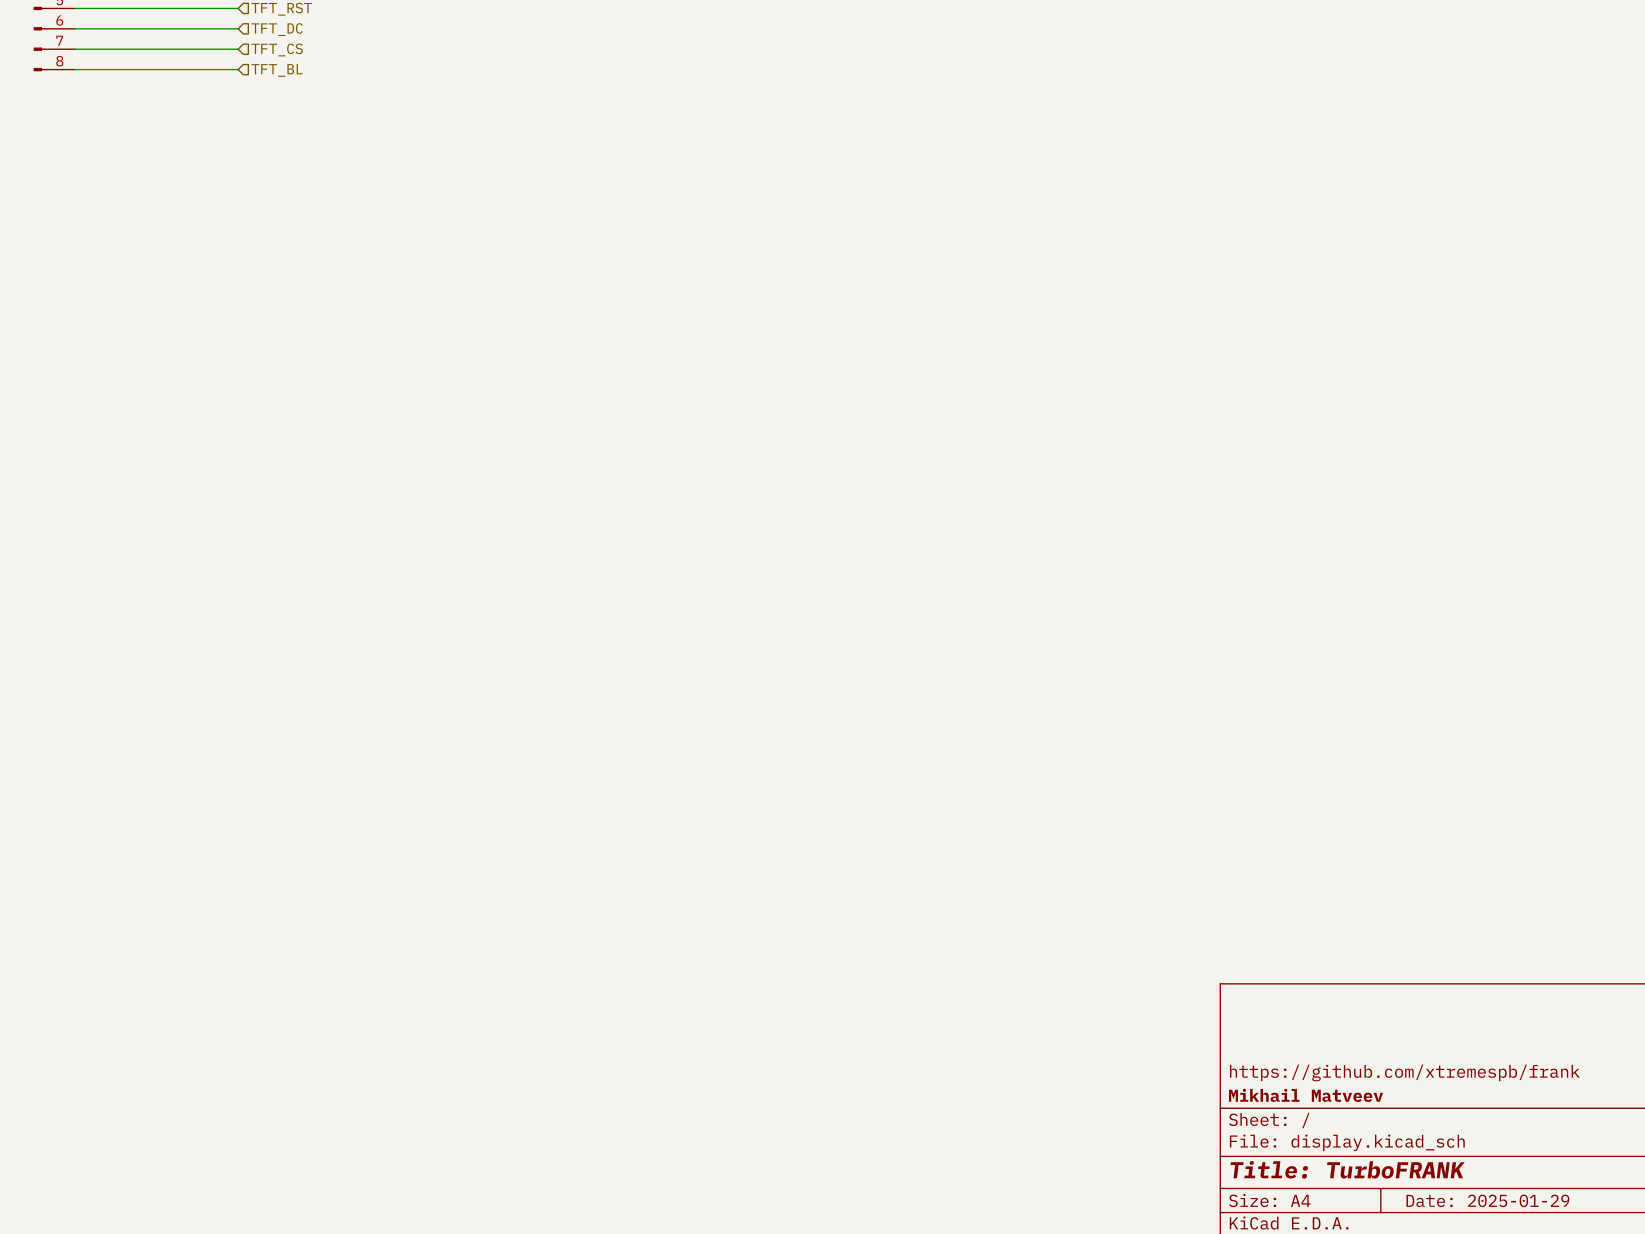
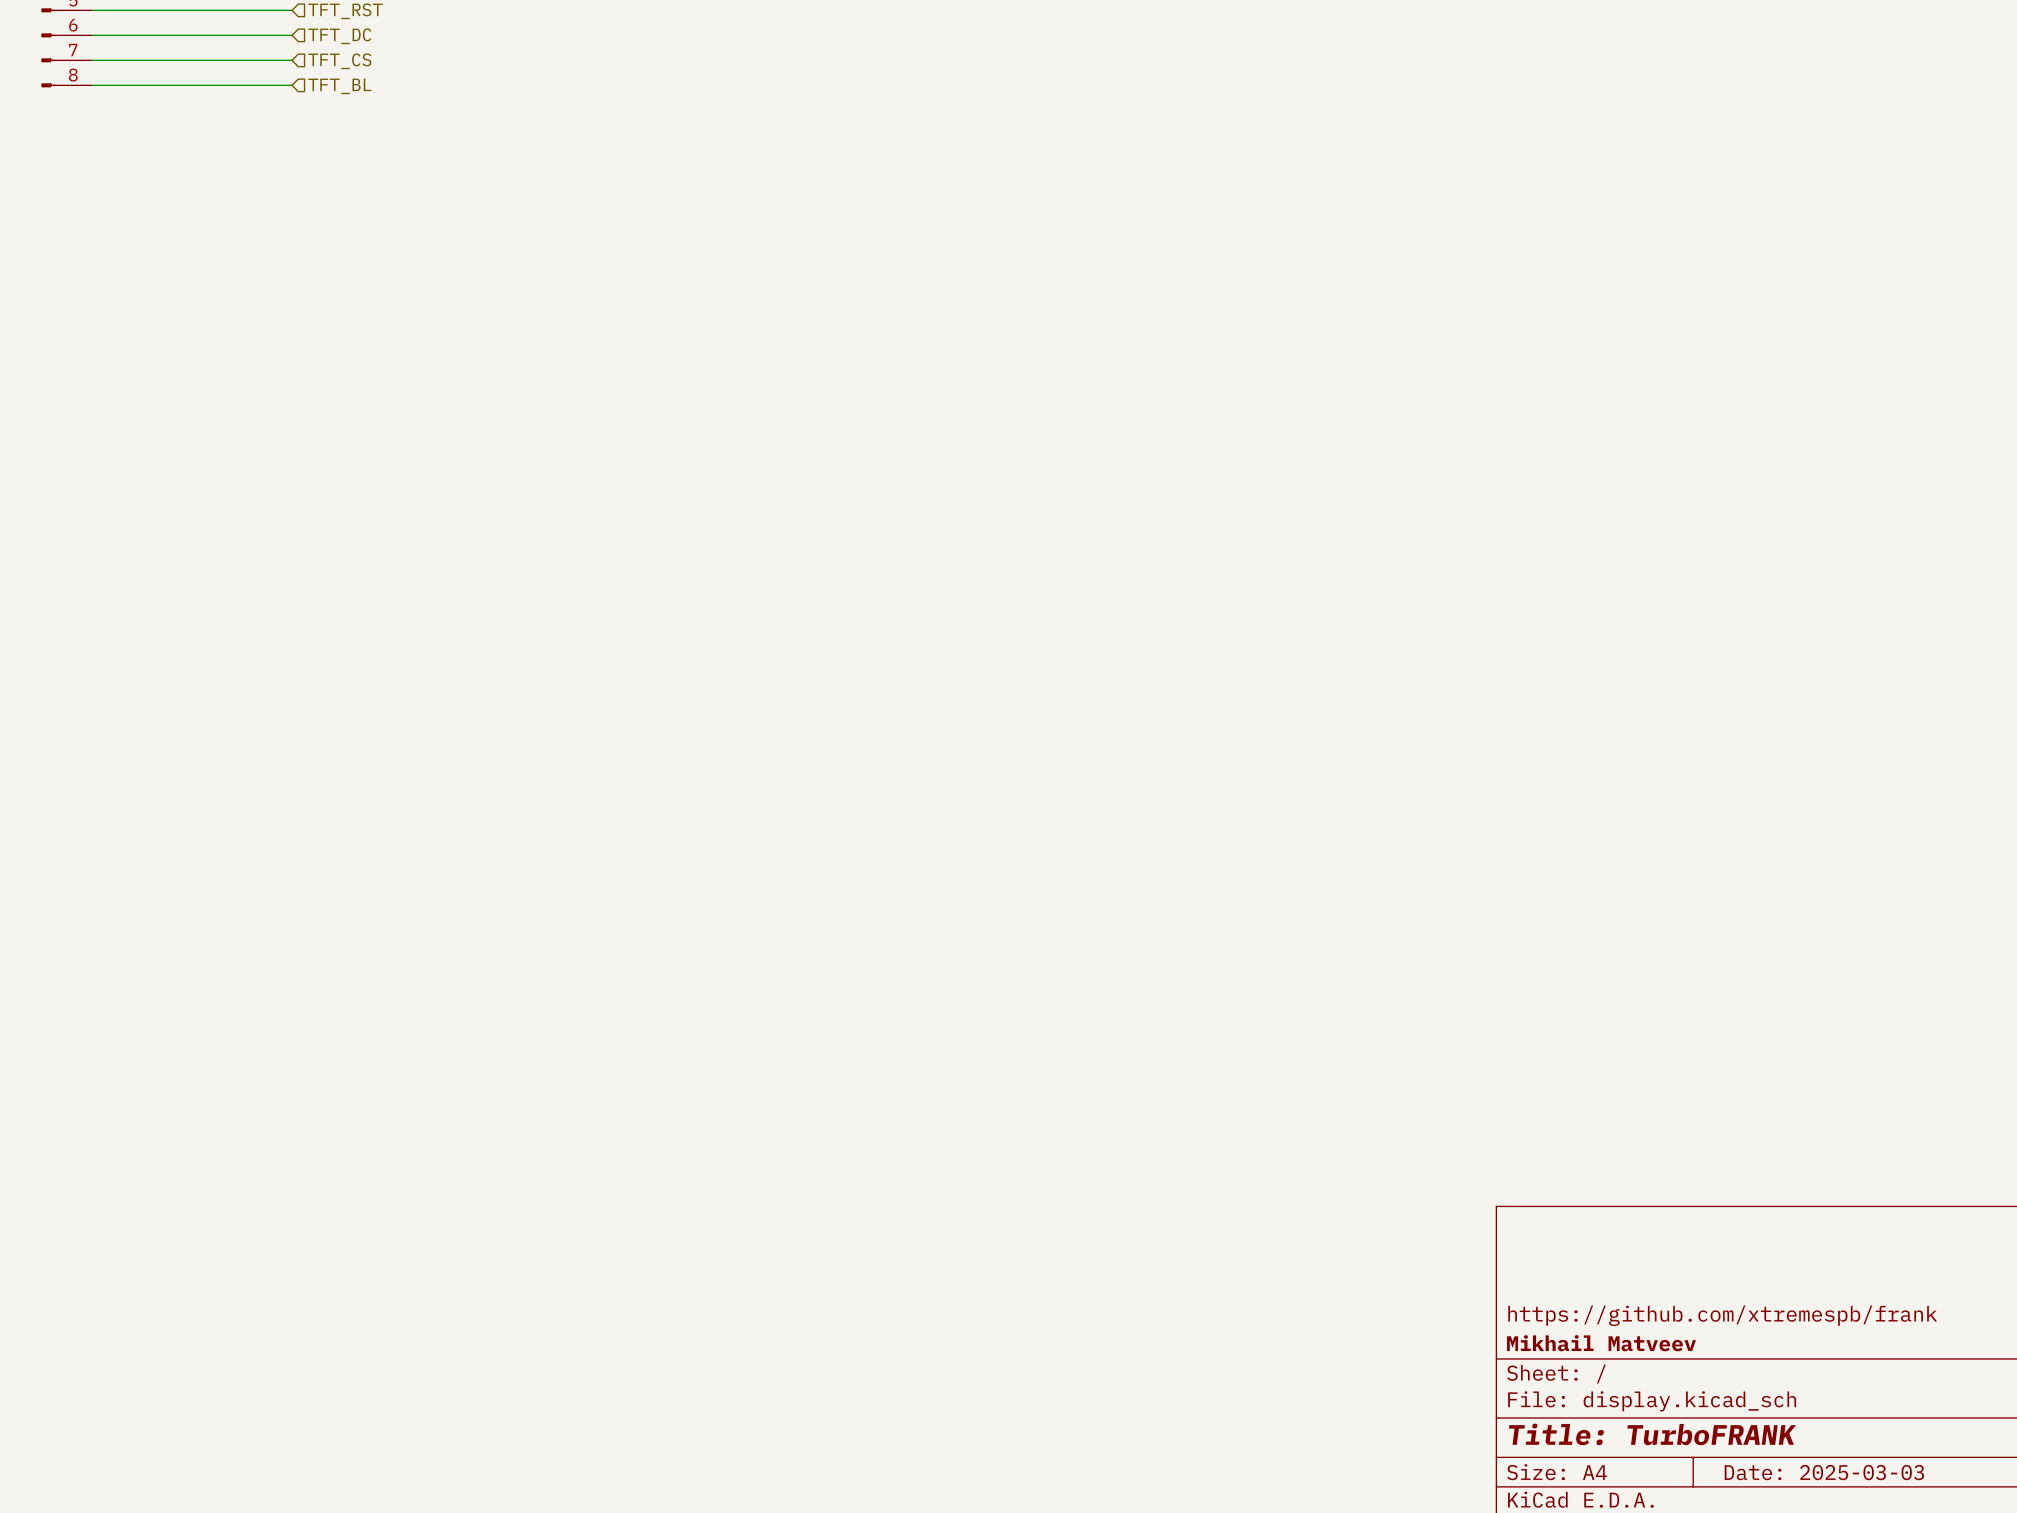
title block: Date: 2025-01-29 (1487, 1200) -> Date: 2025-03-03 (1824, 1472)

